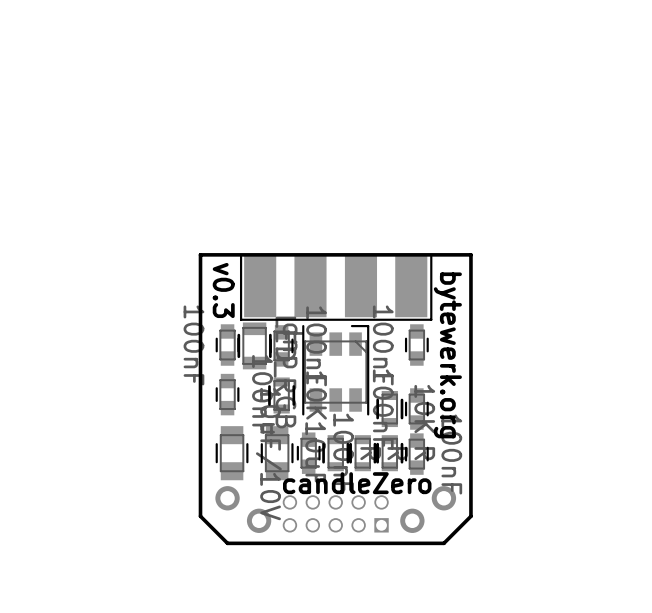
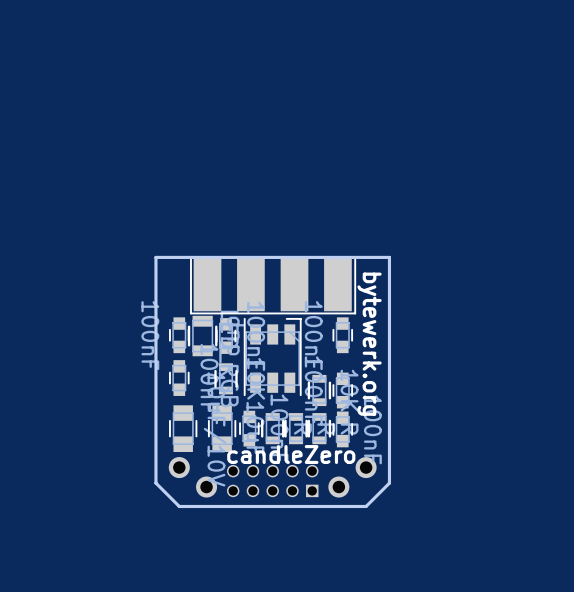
text: v0.3 (223, 290) -> none

